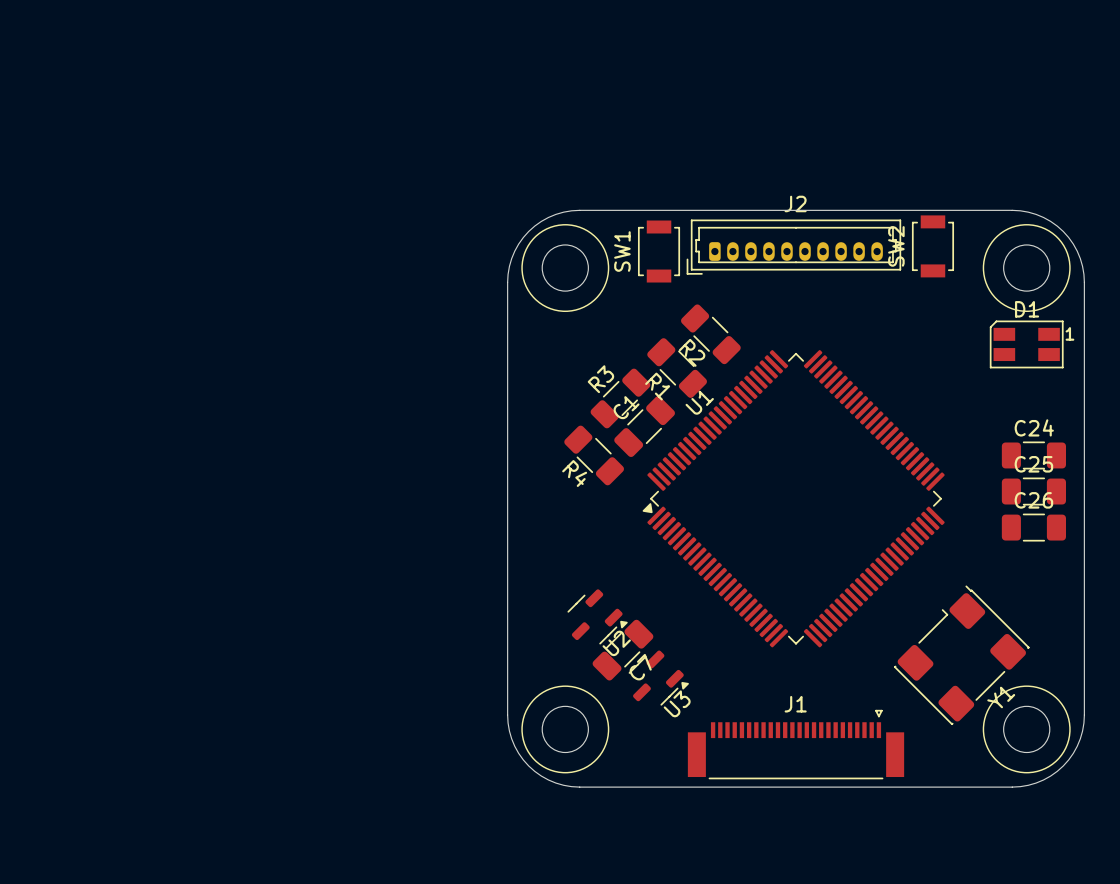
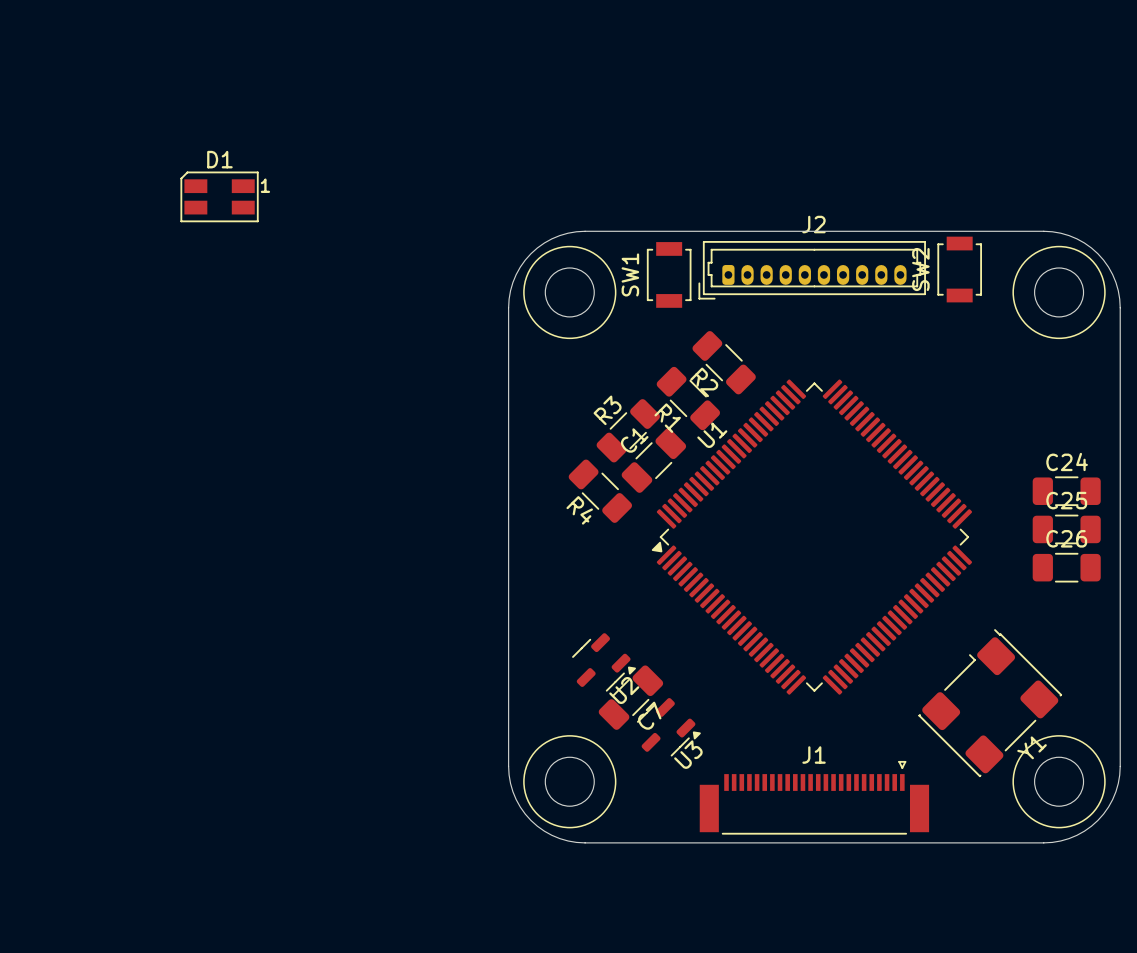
D1 position: (1026, 344) -> (219, 196)

